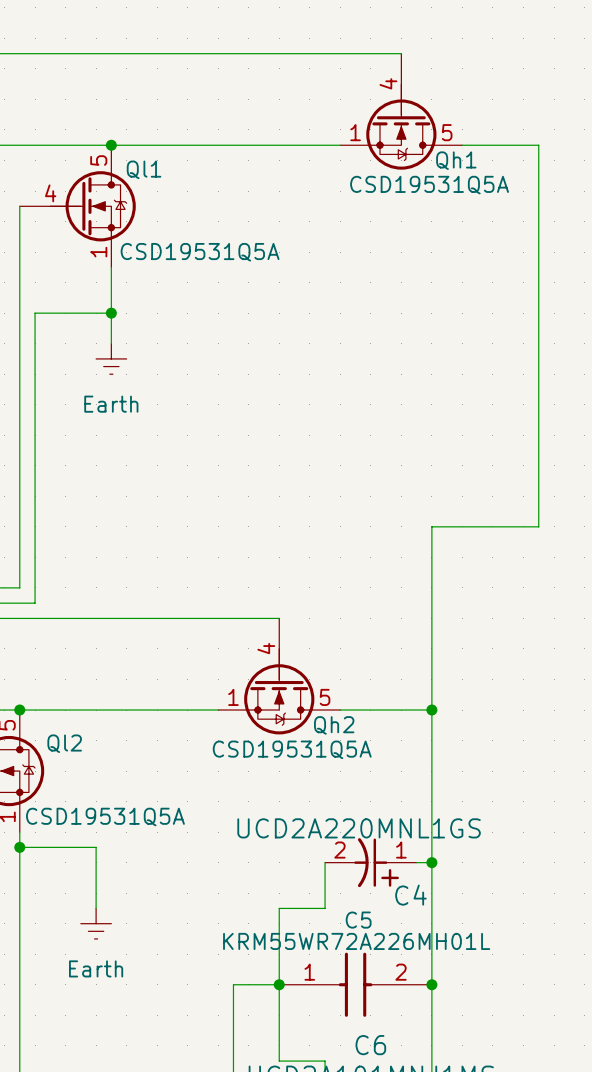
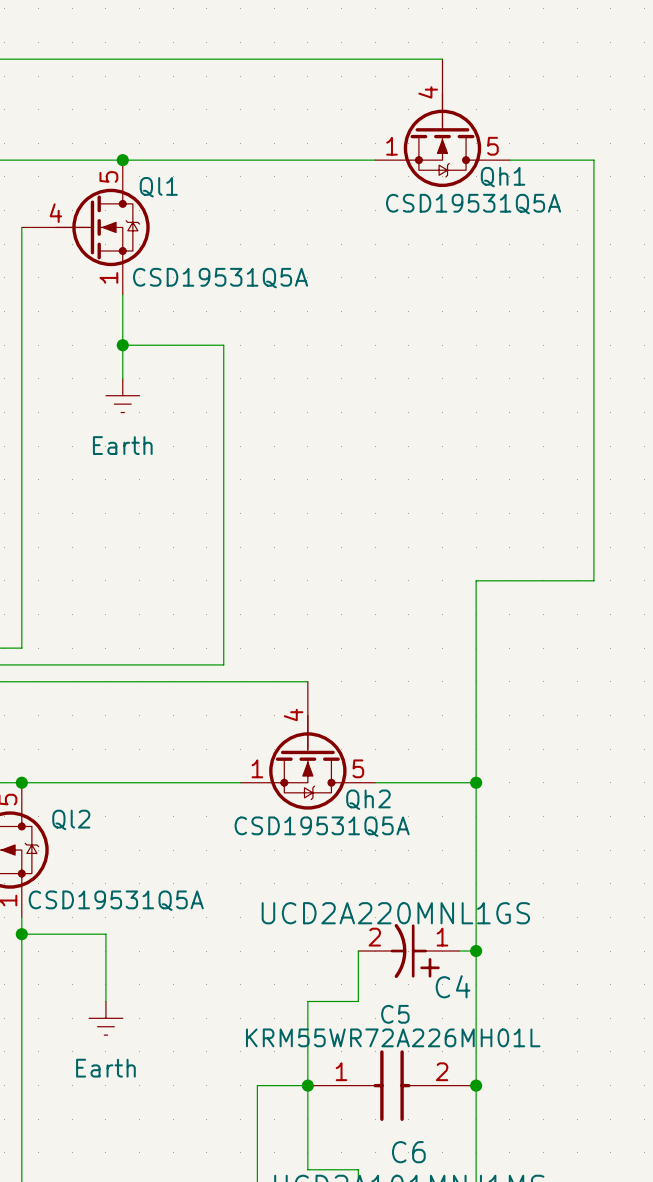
wire: (111, 313) (35, 313) (35, 603) -> (122, 345) (223, 345) (223, 664) (38, 664)

